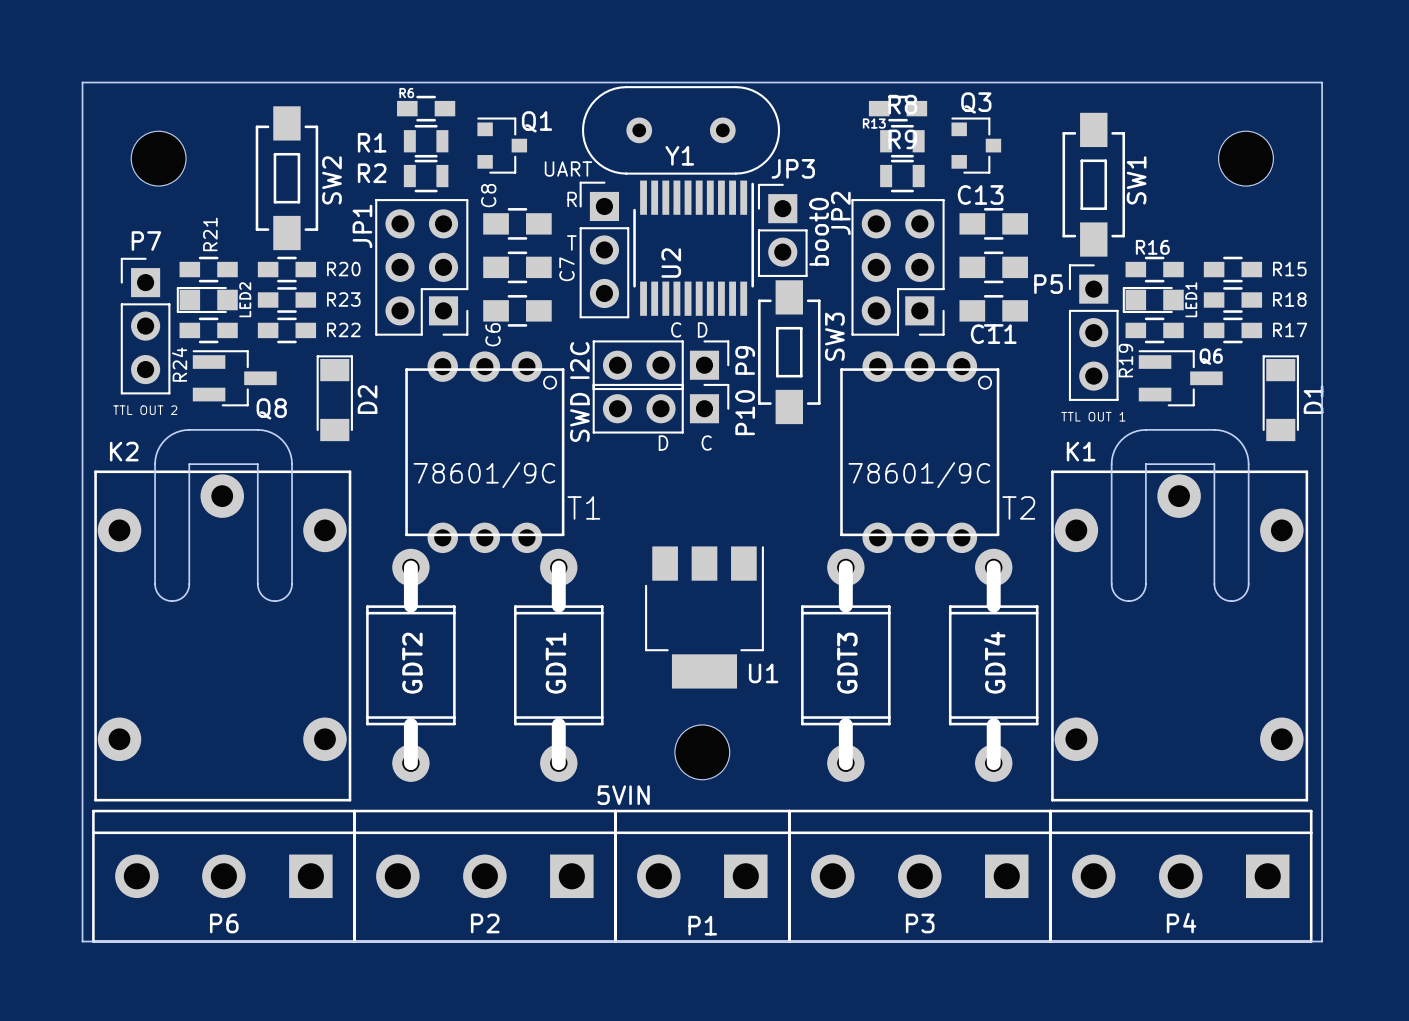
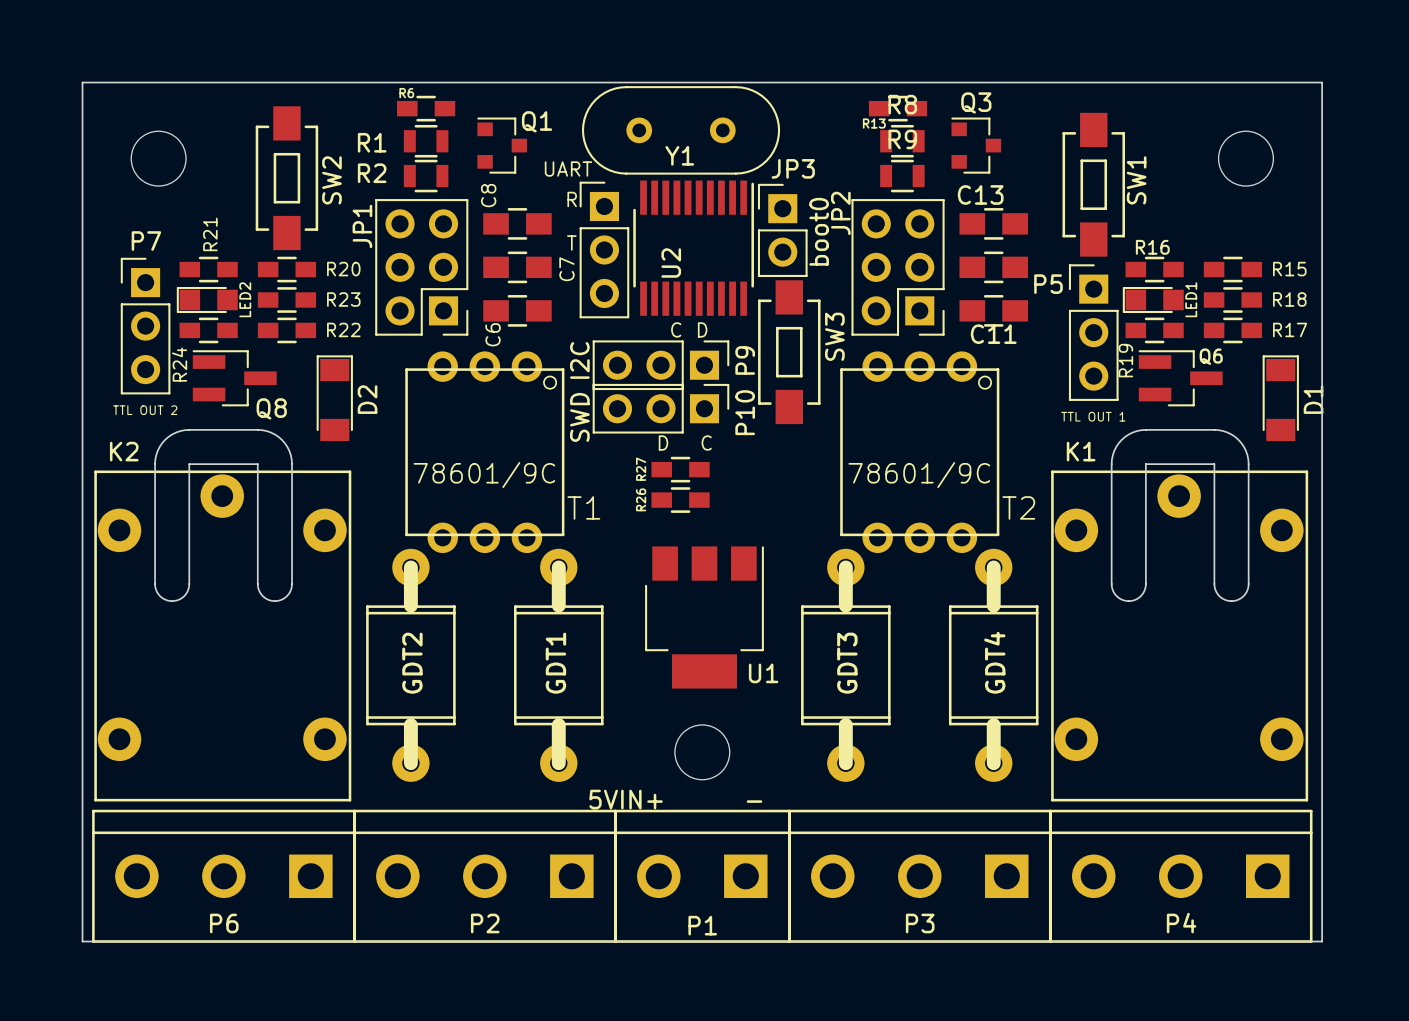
R27: none -> (680, 469)
R26: none -> (680, 500)
P1 value: 5VIN (623, 795) -> 5VIN+ - (675, 799)

